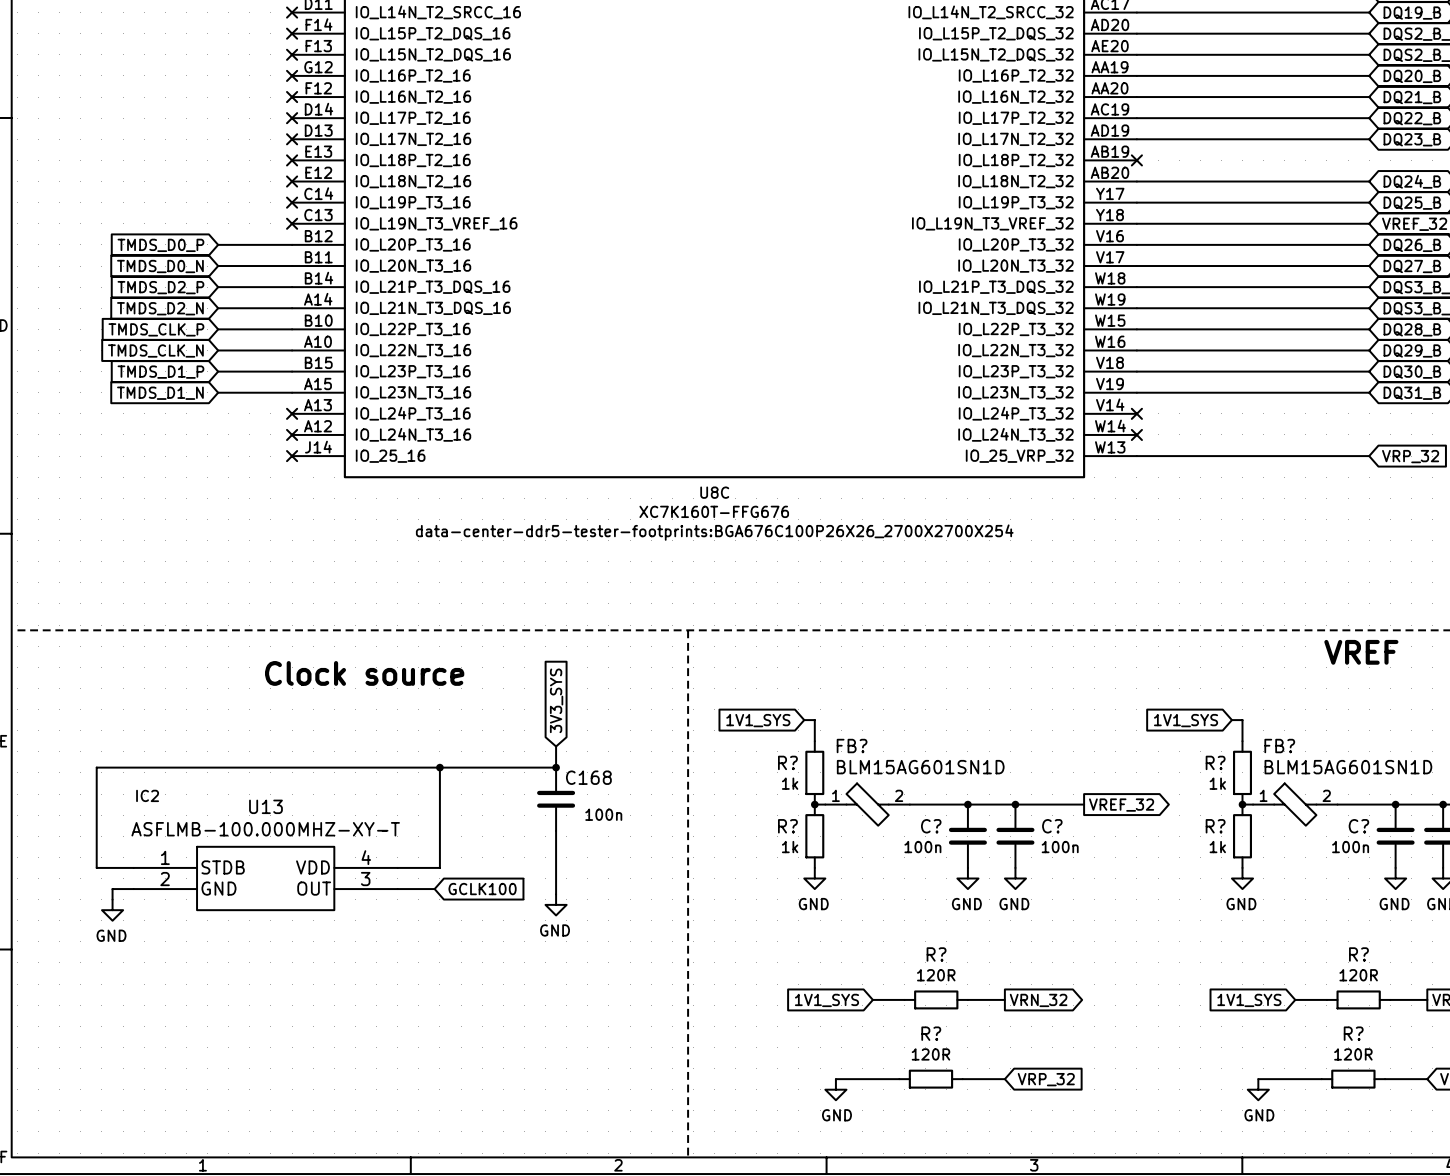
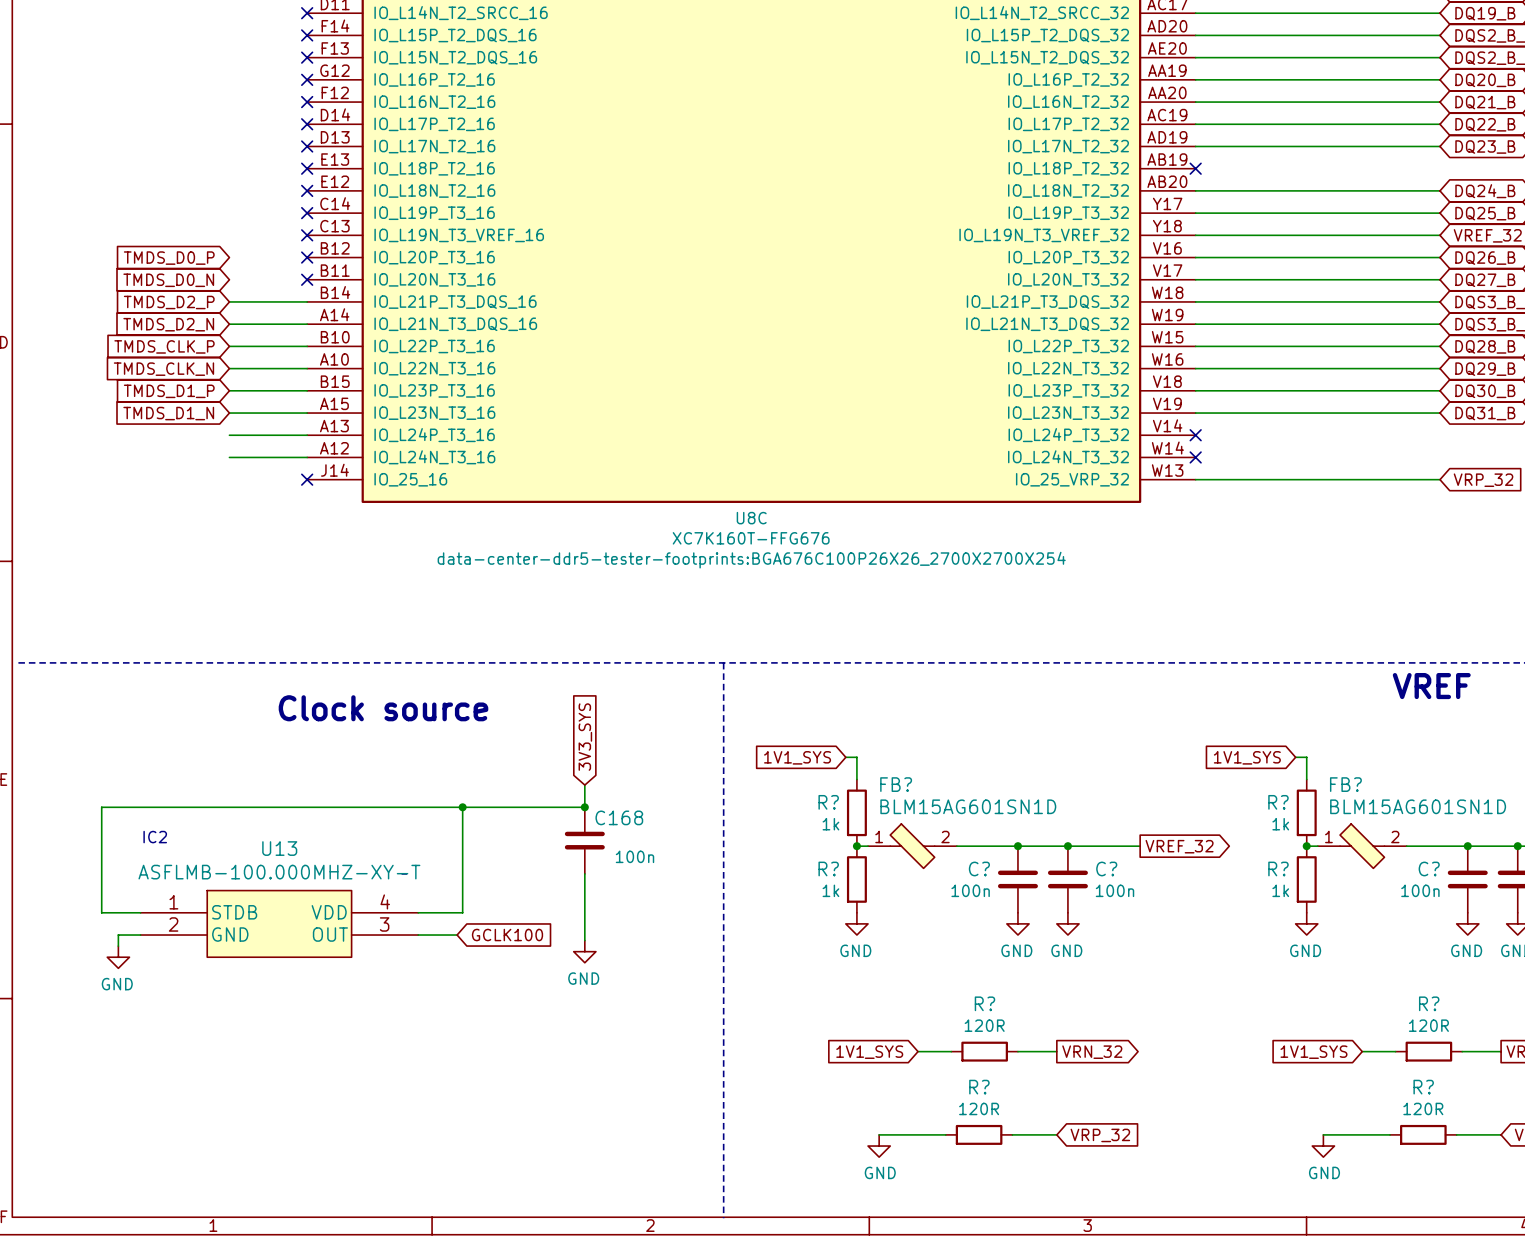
wire: (218, 244) (292, 244) -> (229, 435) (307, 435)
no-connect mark: none -> (307, 257)
wire: (218, 266) (292, 266) -> (229, 457) (307, 457)
no-connect mark: none -> (307, 279)
no-connect mark: (292, 413) -> none
no-connect mark: (292, 434) -> none

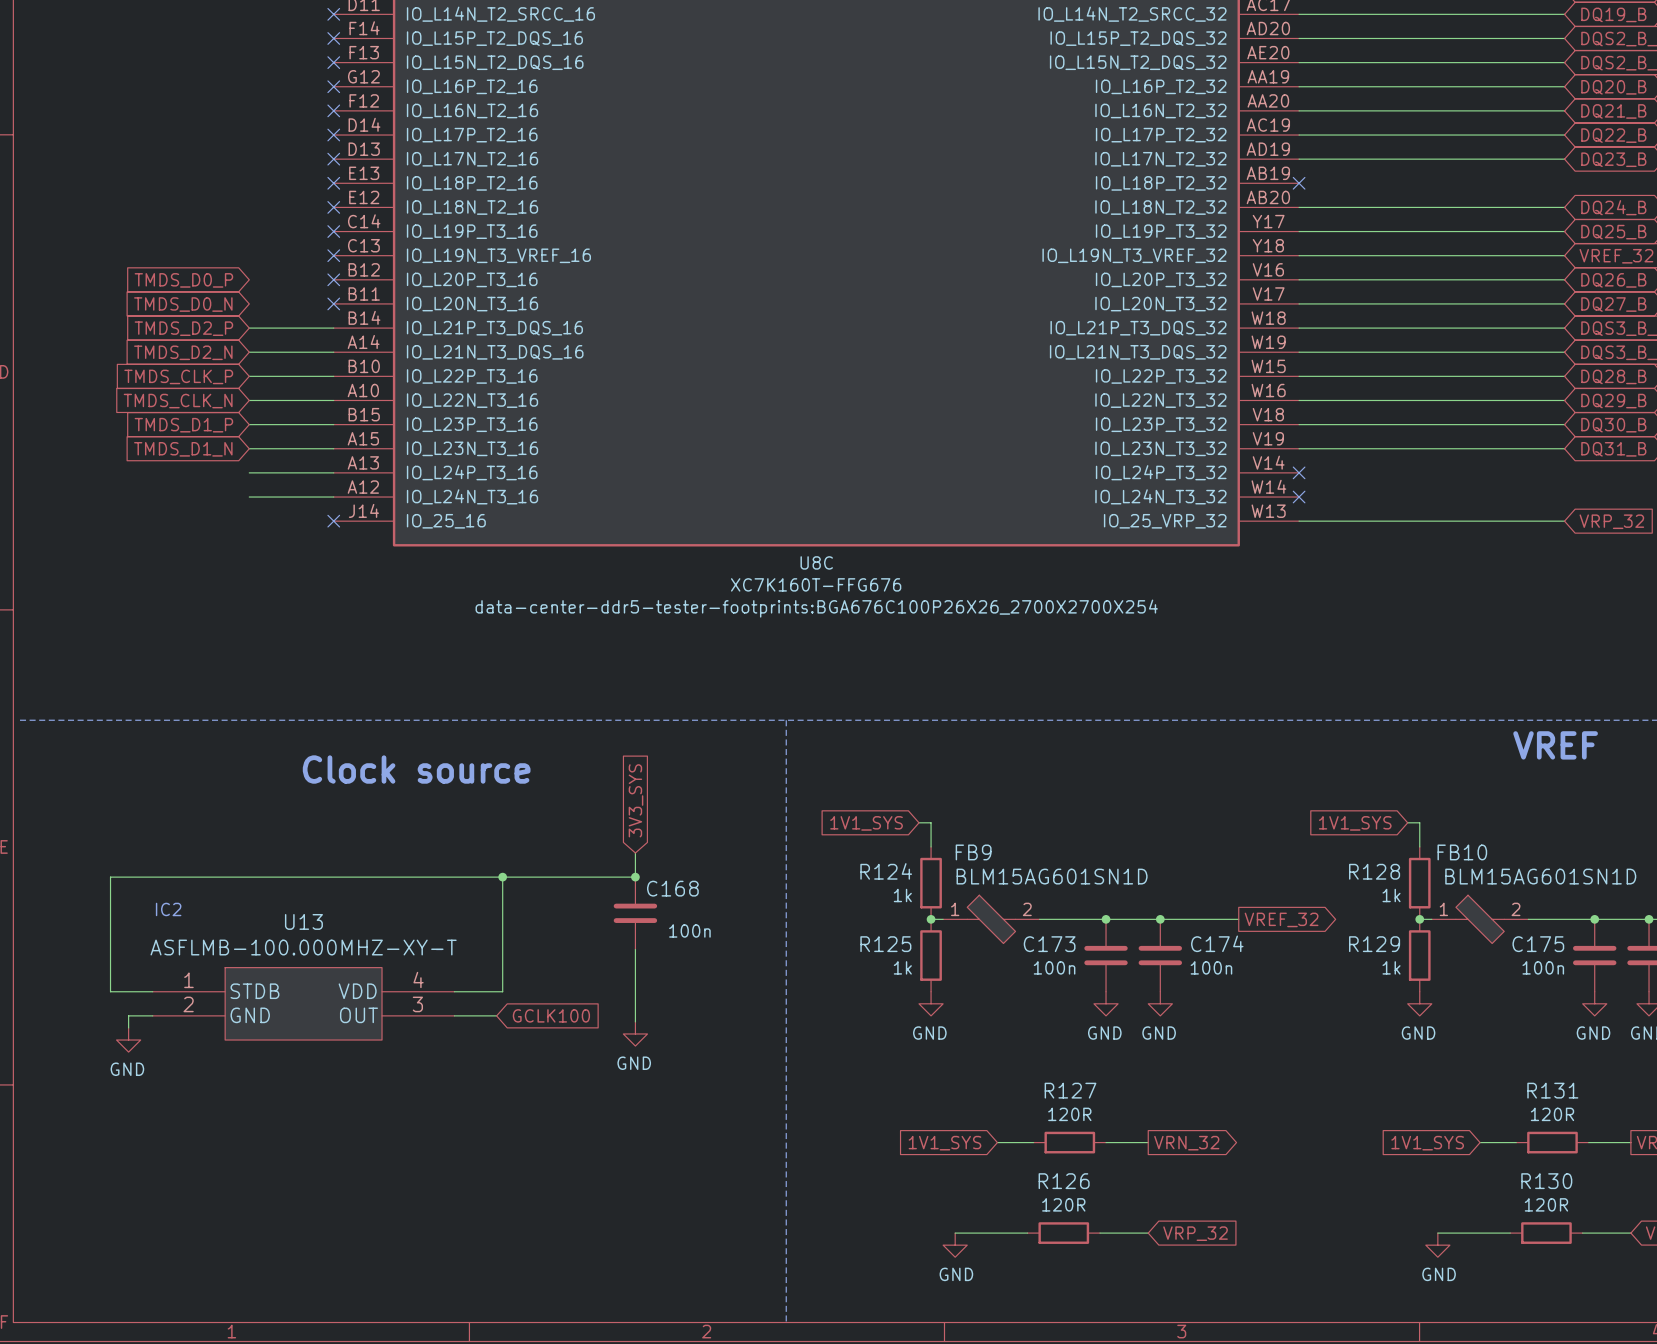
FB? name: FB? (896, 784) -> FB9 (973, 852)
FB? name: FB? (1345, 784) -> FB10 (1462, 852)
R? name: R? (828, 802) -> R124 (886, 871)
R? name: R? (1278, 802) -> R128 (1374, 871)
R? name: R? (828, 868) -> R125 (885, 944)
C? name: C? (979, 868) -> C173 (1049, 944)
C? name: C? (1106, 868) -> C174 (1217, 943)
R? name: R? (1278, 868) -> R129 (1374, 944)
C? name: C? (1429, 868) -> C175 (1538, 944)
R? name: R? (984, 1003) -> R127 (1070, 1090)
R? name: R? (1429, 1003) -> R131 (1552, 1090)
R? name: R? (979, 1087) -> R126 (1064, 1181)
R? name: R? (1423, 1087) -> R130 (1546, 1181)

